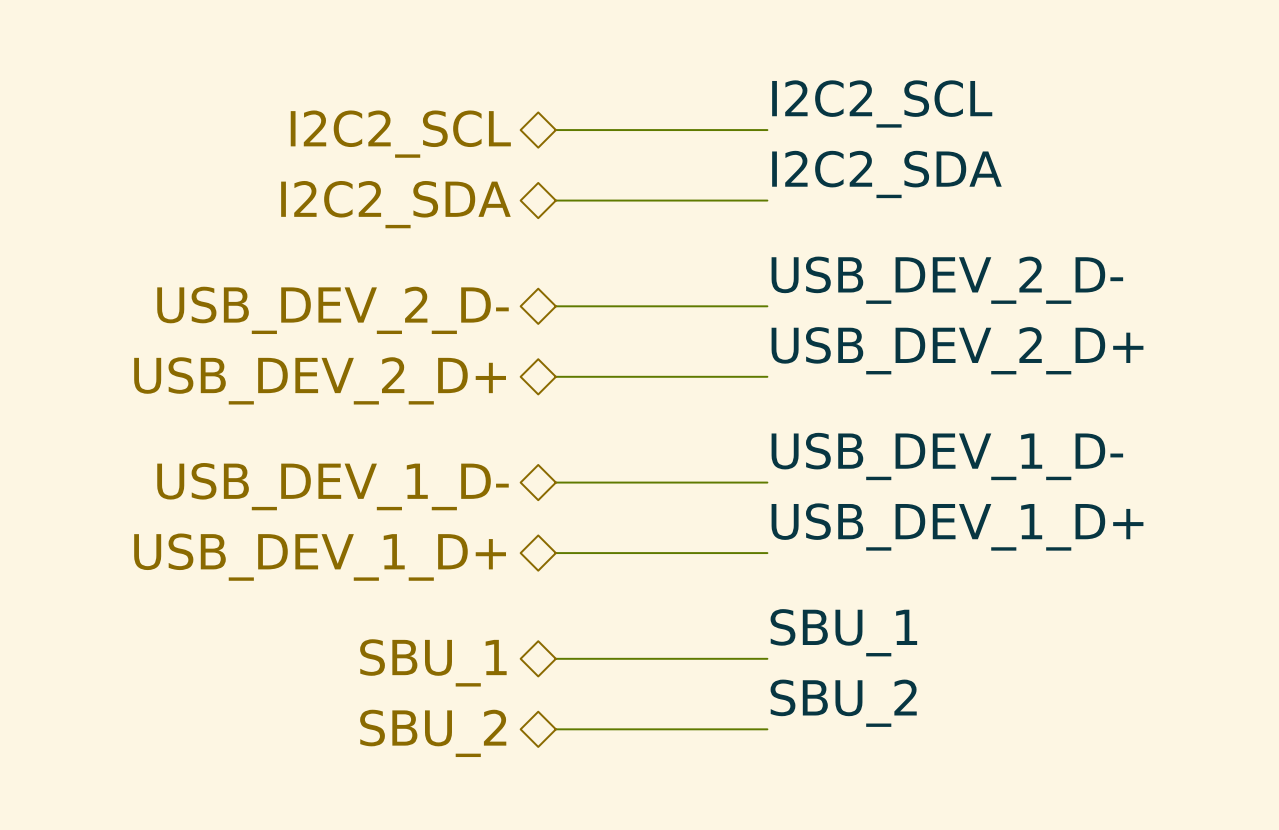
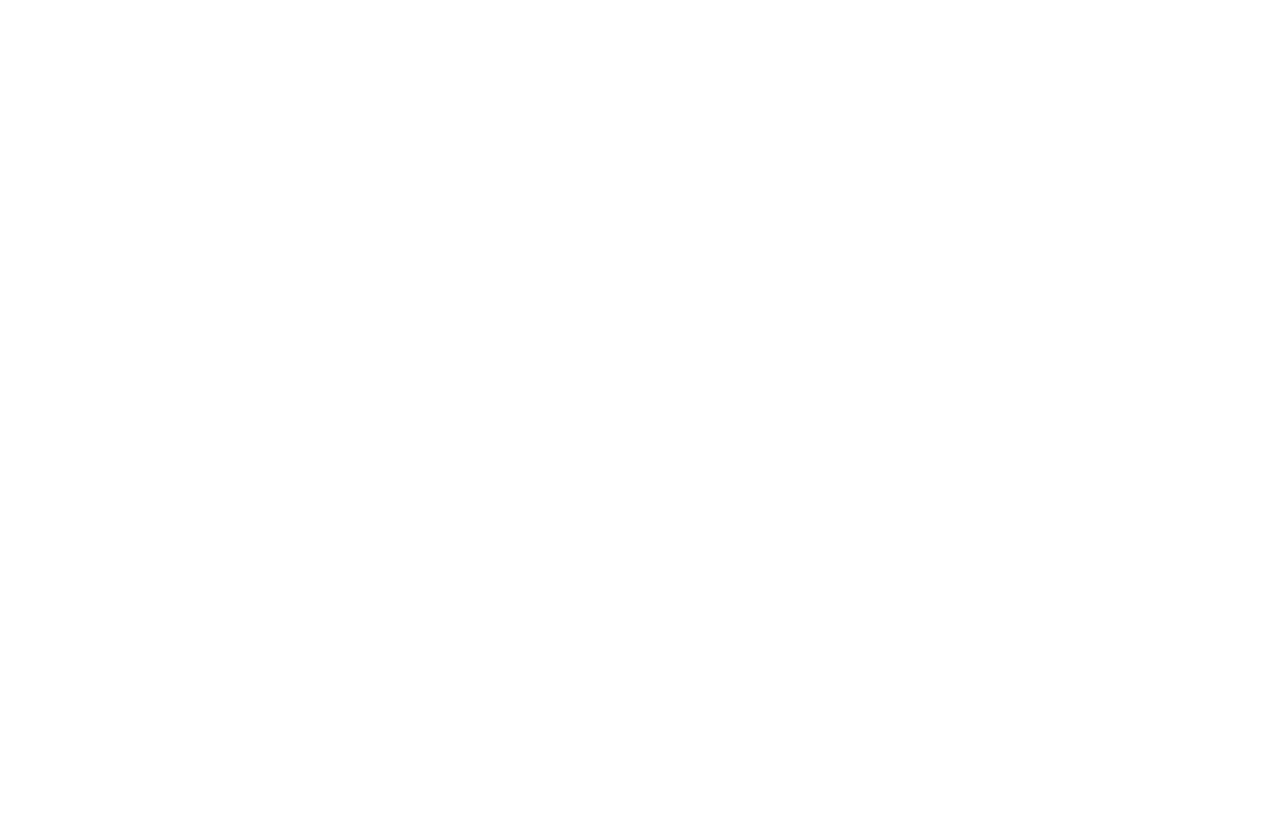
label: I2C2_SCL (882, 103) -> none
wire: (555, 130) (767, 130) -> none
hierarchical label: I2C2_SCL (400, 134) -> none
label: I2C2_SDA (886, 174) -> none
wire: (555, 200) (767, 200) -> none
hierarchical label: I2C2_SDA (395, 204) -> none
label: USB_DEV_2_D- (947, 280) -> none
wire: (555, 306) (767, 306) -> none
hierarchical label: USB_DEV_2_D- (333, 310) -> none
label: USB_DEV_2_D+ (957, 350) -> none
wire: (555, 376) (767, 376) -> none
hierarchical label: USB_DEV_2_D+ (320, 380) -> none
label: USB_DEV_1_D- (947, 456) -> none
wire: (555, 482) (767, 482) -> none
hierarchical label: USB_DEV_1_D- (333, 486) -> none
label: USB_DEV_1_D+ (957, 526) -> none
wire: (555, 553) (767, 553) -> none
hierarchical label: USB_DEV_1_D+ (320, 557) -> none
label: SBU_1 (843, 632) -> none
wire: (555, 658) (767, 658) -> none
hierarchical label: SBU_1 (433, 662) -> none
label: SBU_2 (843, 703) -> none
wire: (555, 729) (767, 729) -> none
hierarchical label: SBU_2 (433, 733) -> none

